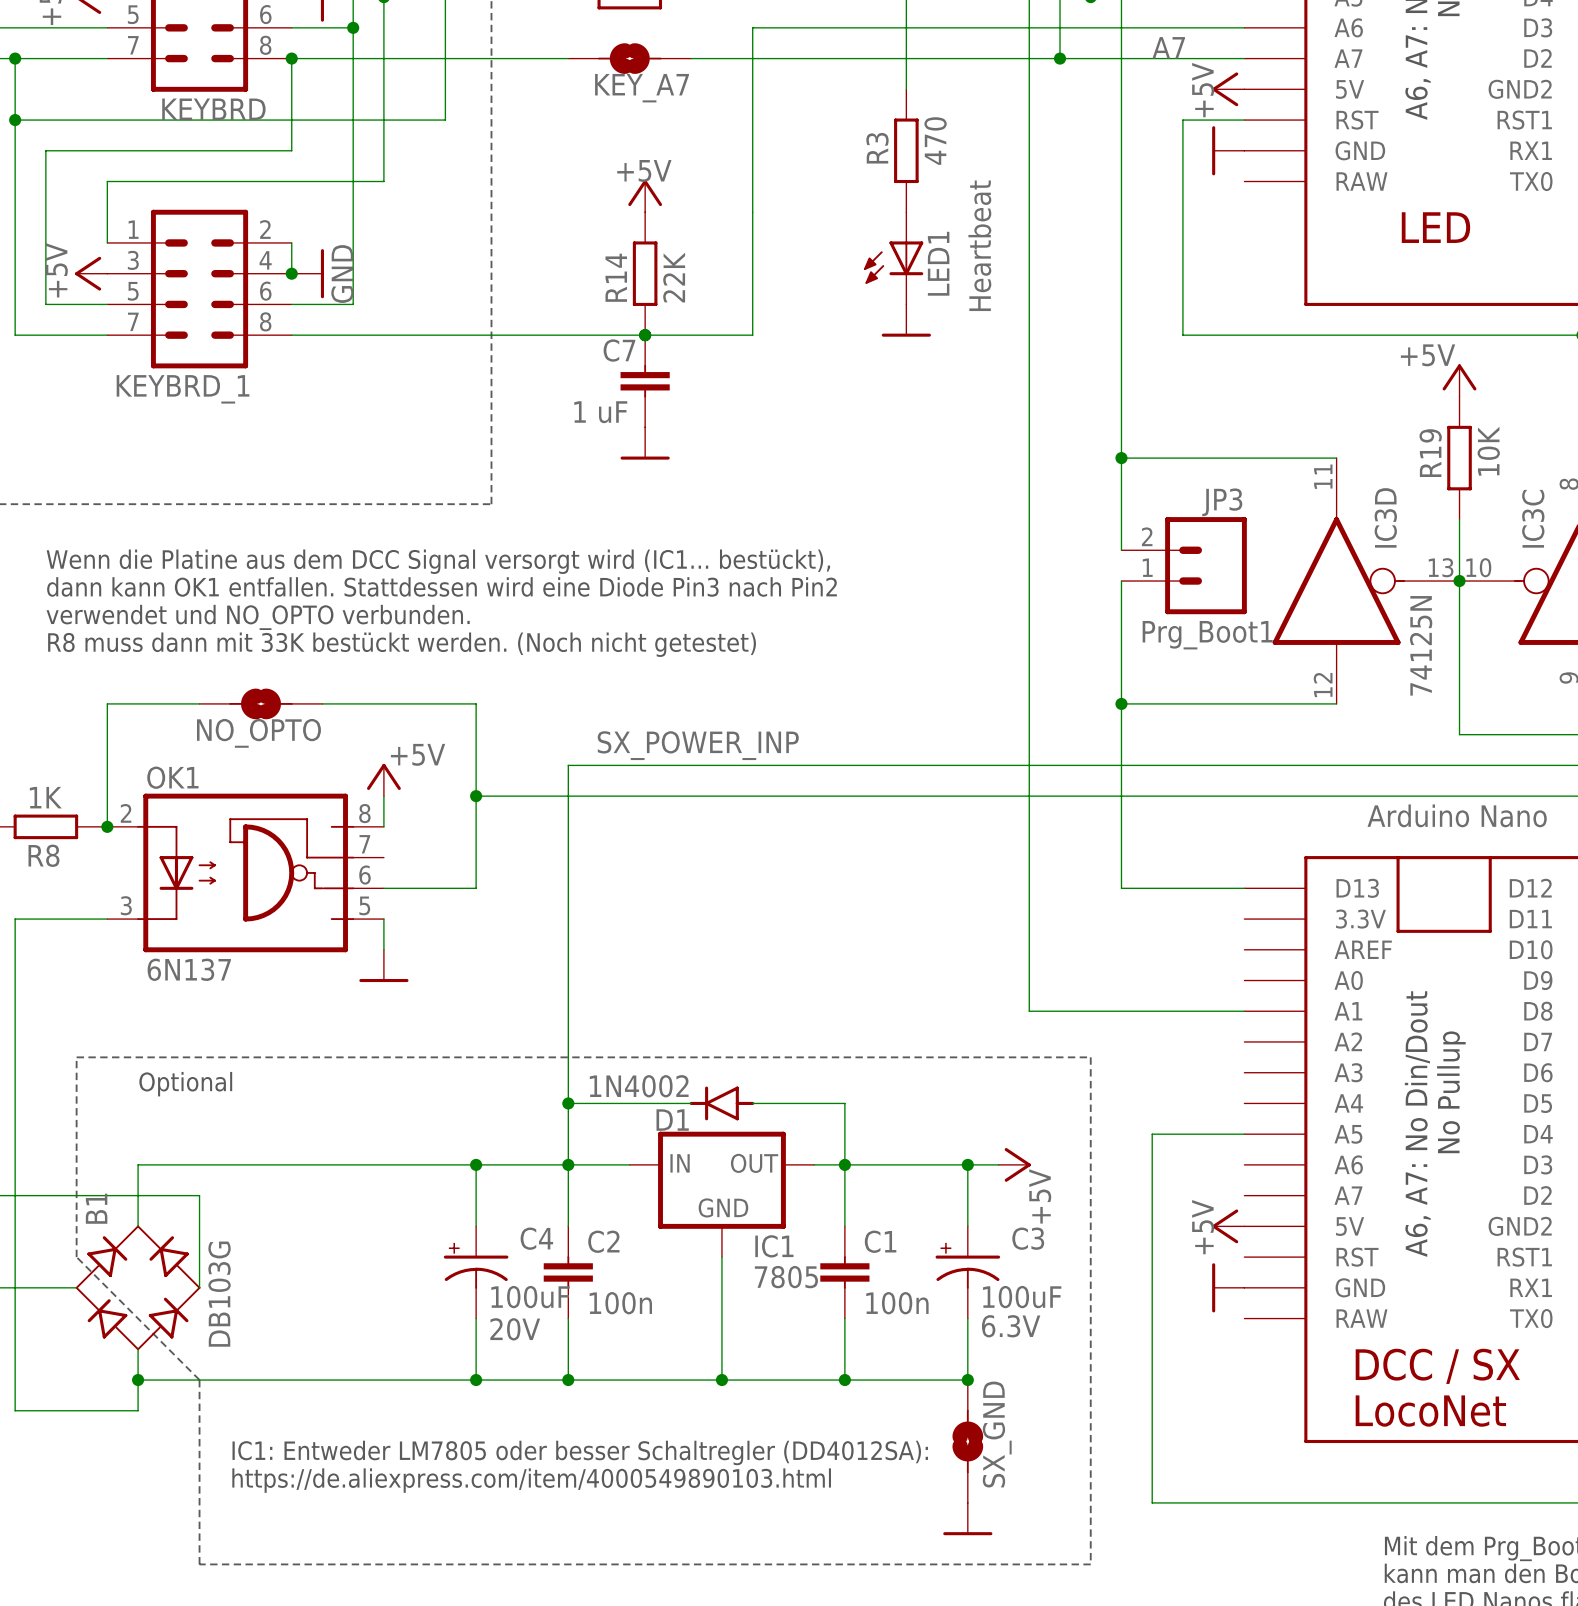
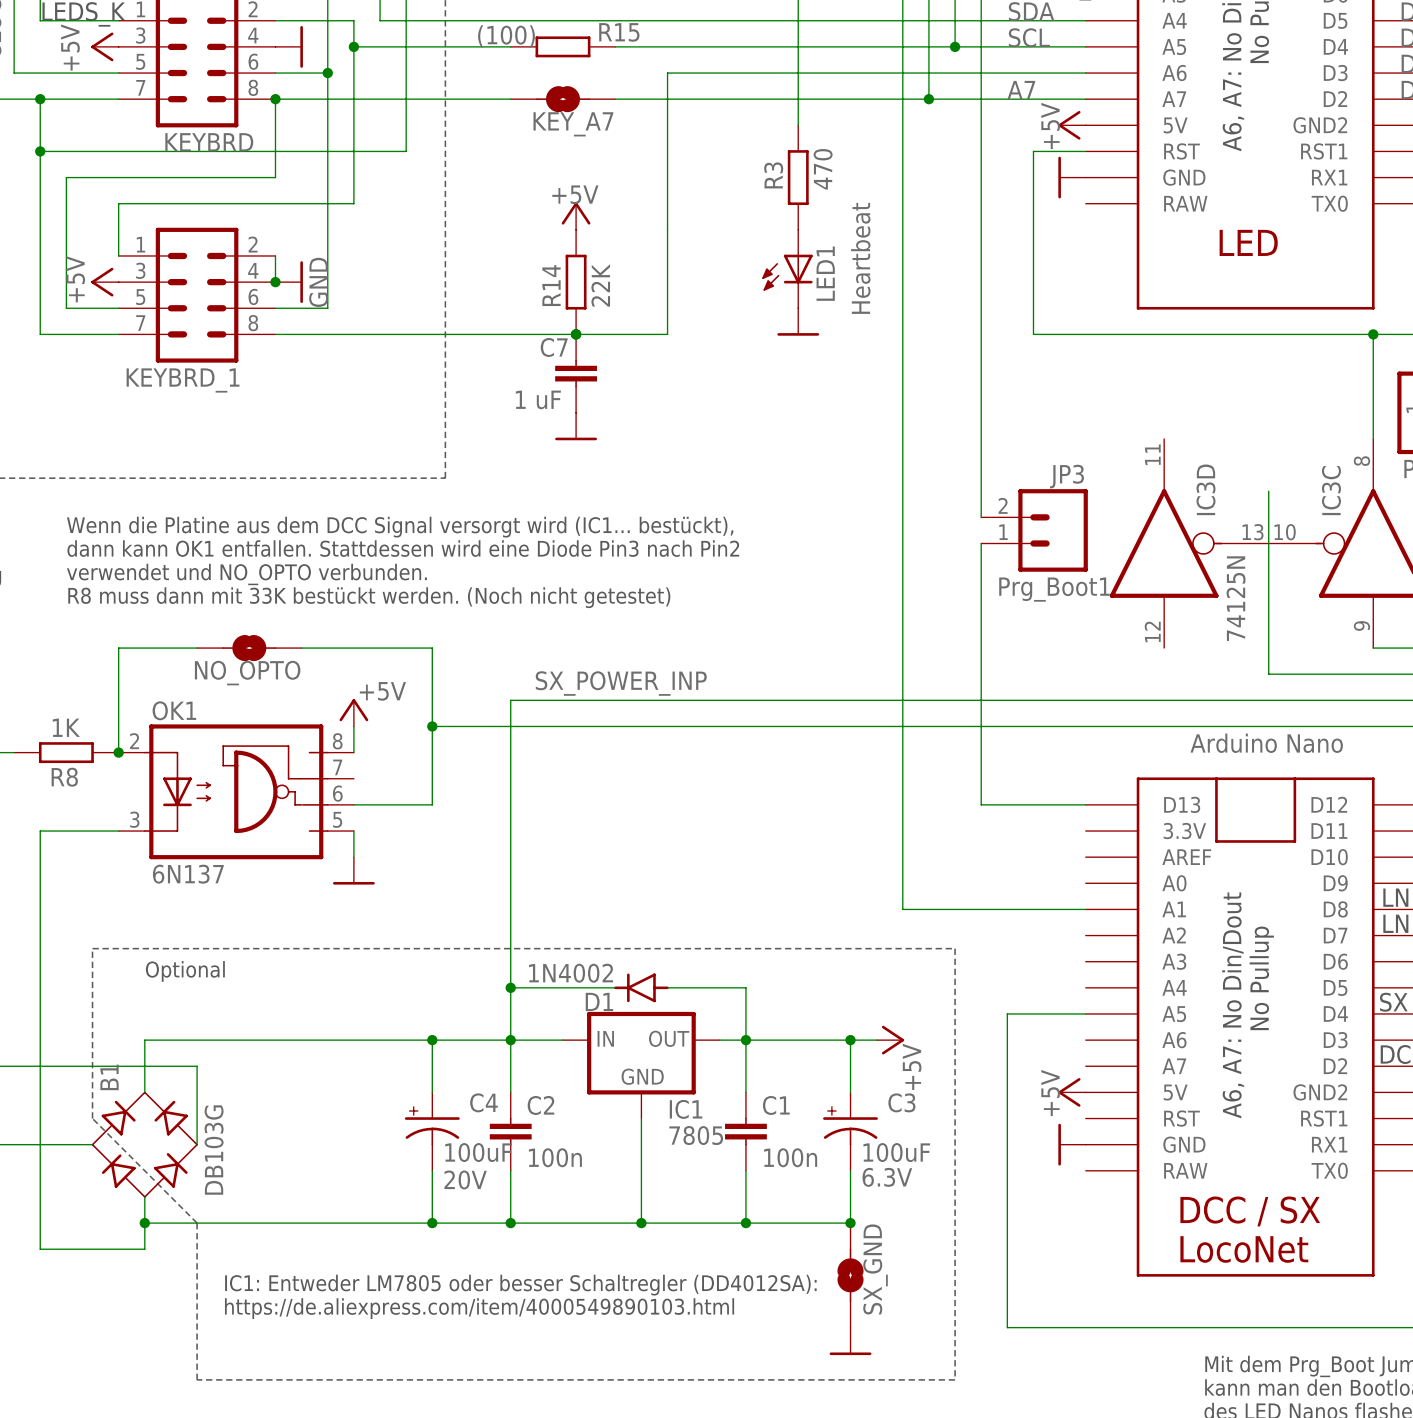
power symbol: +5V (1459, 380) -> none
wire: (1121, 458) (1336, 458) -> none
junction: (1121, 458) -> none
R19: 10K (1459, 458) -> none
junction: (1459, 581) -> none
wire: (1121, 703) (1336, 703) -> none
junction: (1121, 703) -> none

